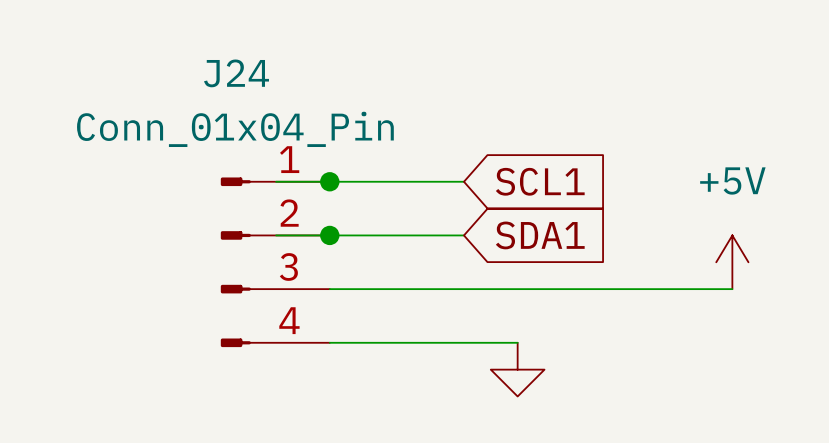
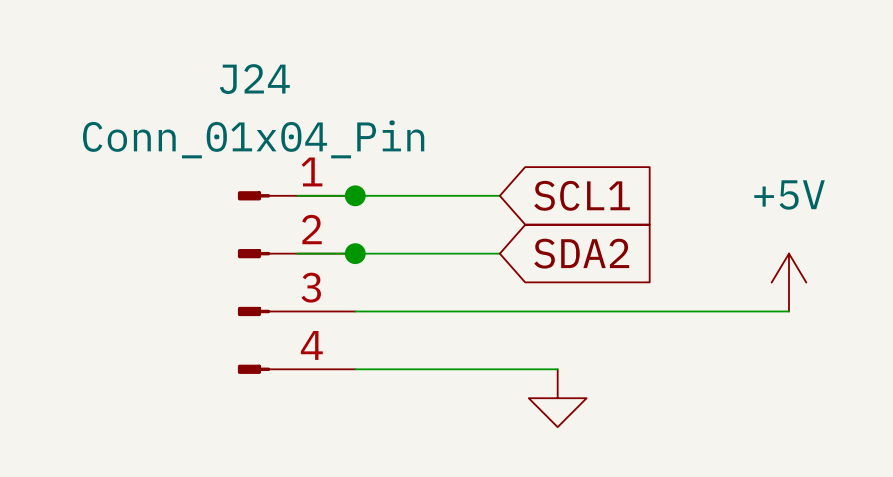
global label: SDA1 (540, 235) -> SDA2 (581, 253)

